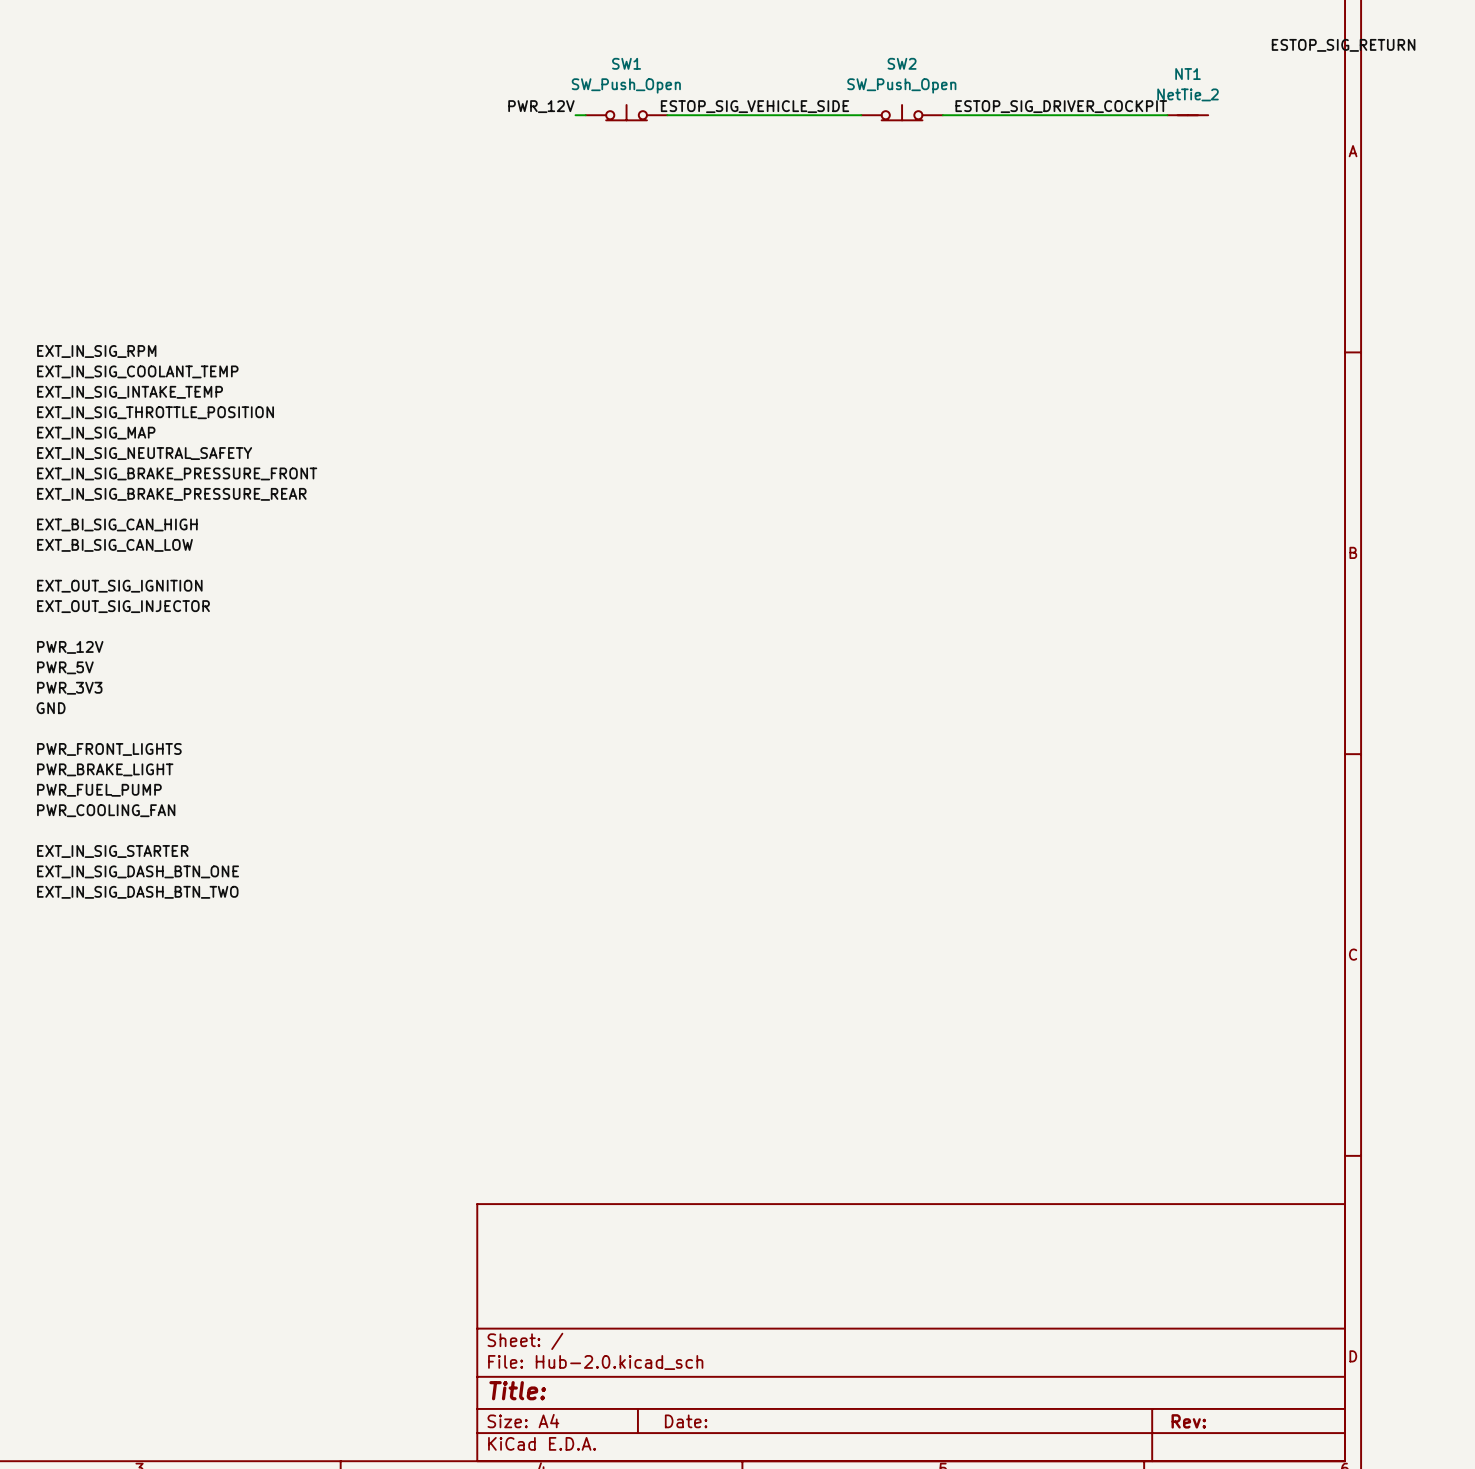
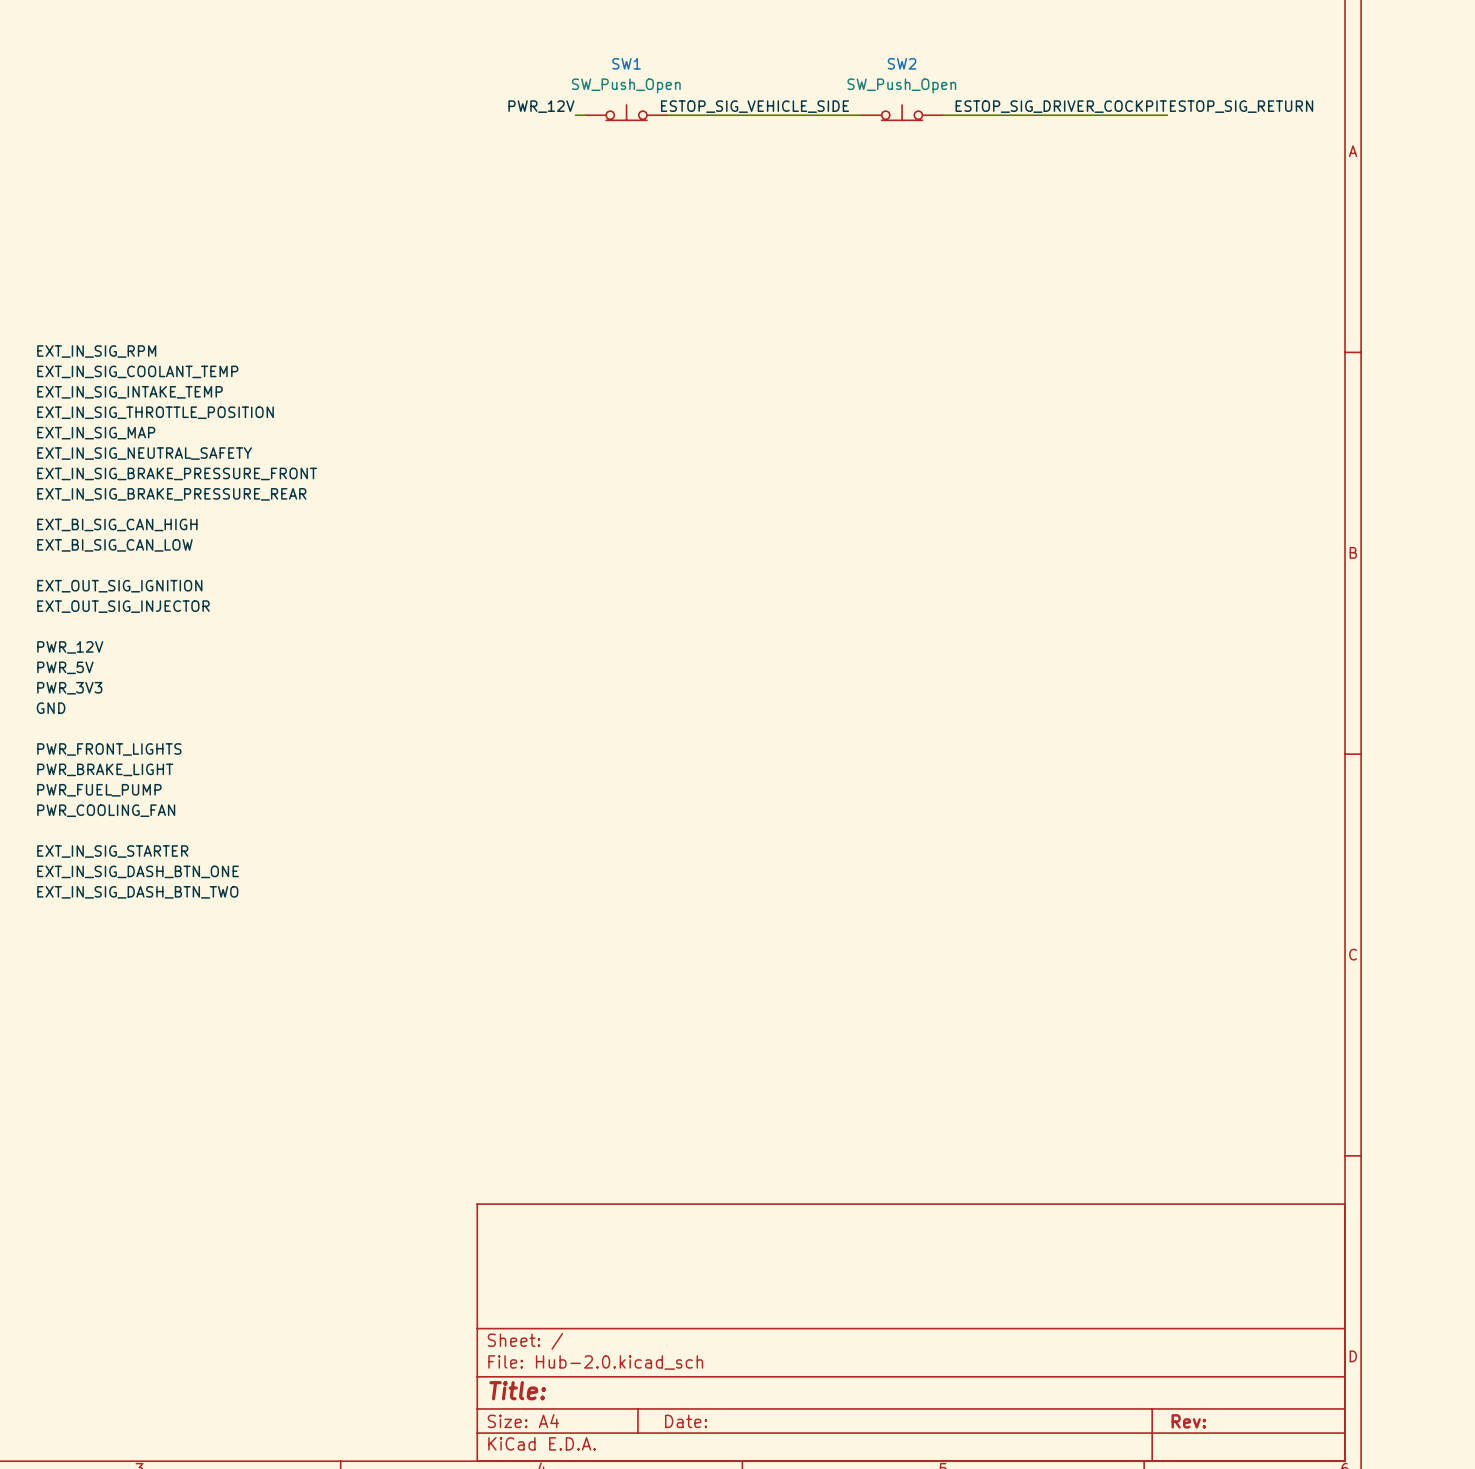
label position: ESTOP_SIG_RETURN (1343, 45) -> ESTOP_SIG_RETURN (1241, 106)
NT1: NetTie_2 (1187, 115) -> none

